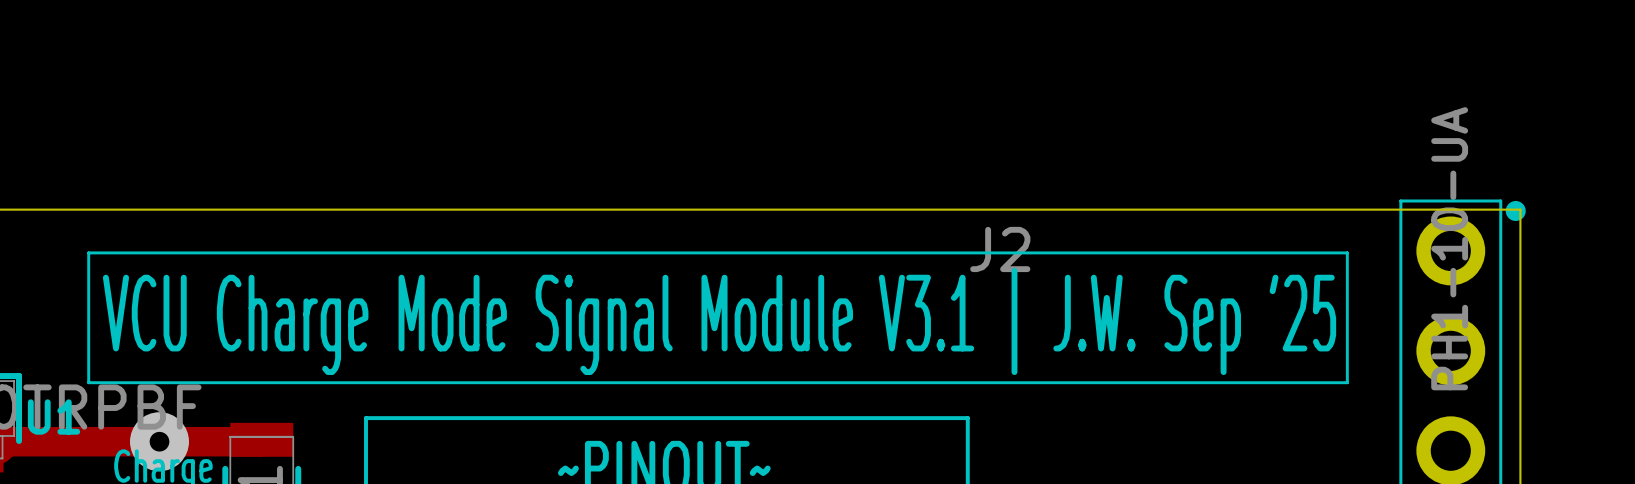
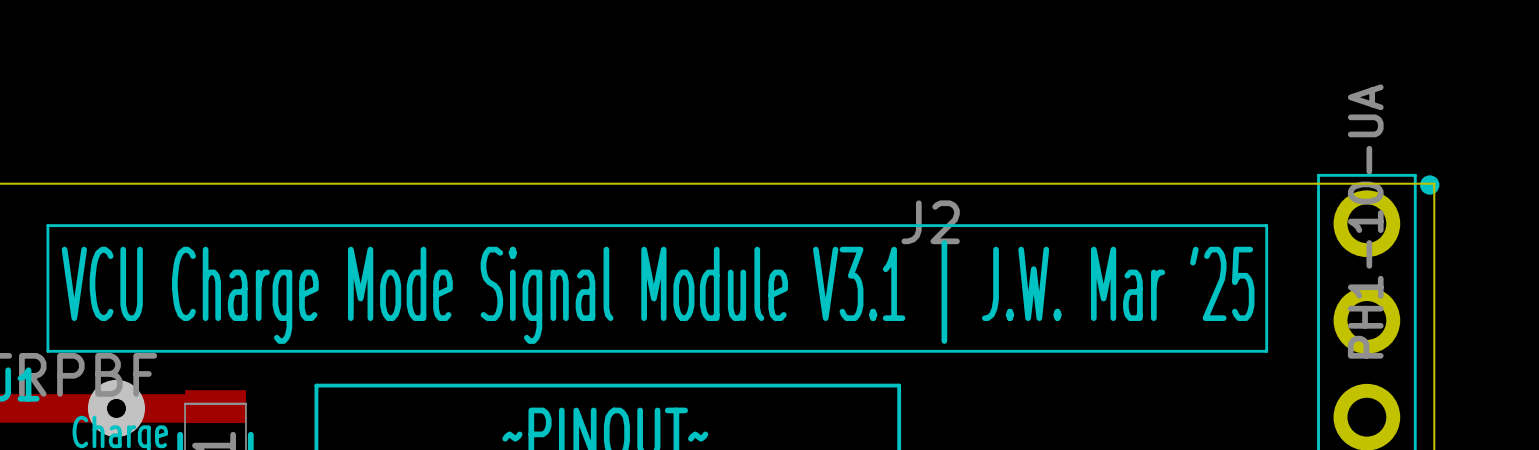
text: VCU Charge Mode Signal Module V3.1 | J.W. Sep '25 (719, 321) -> VCU Charge Mode Signal Module V3.1 | J.W. Mar '25 (658, 292)

